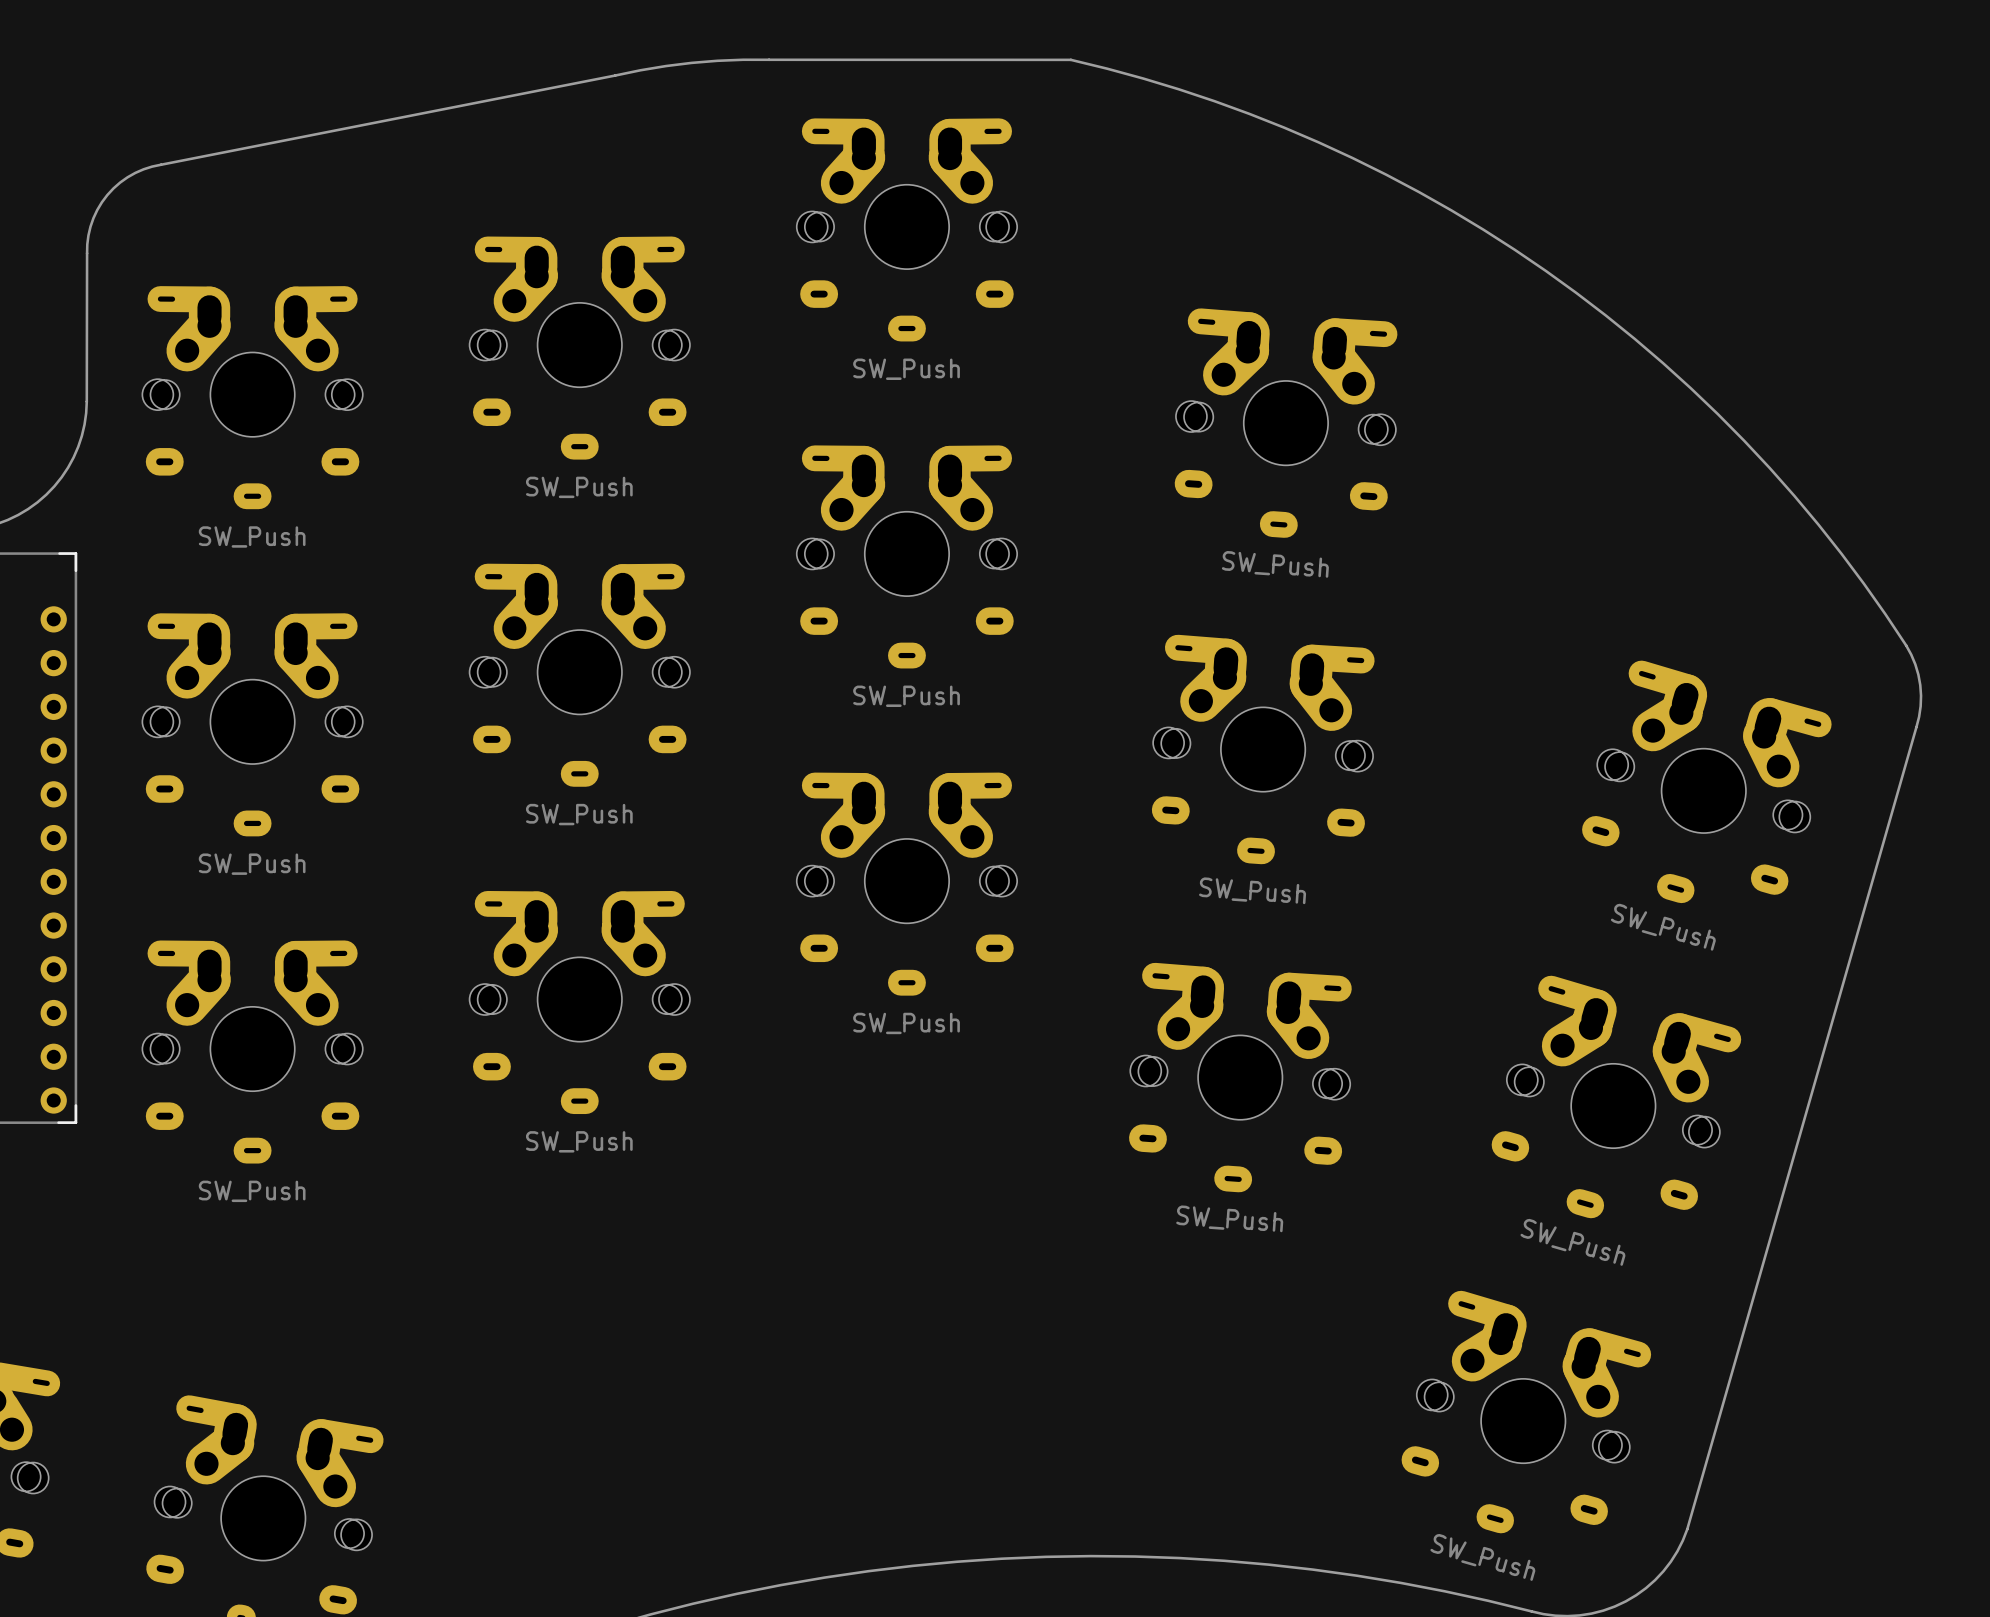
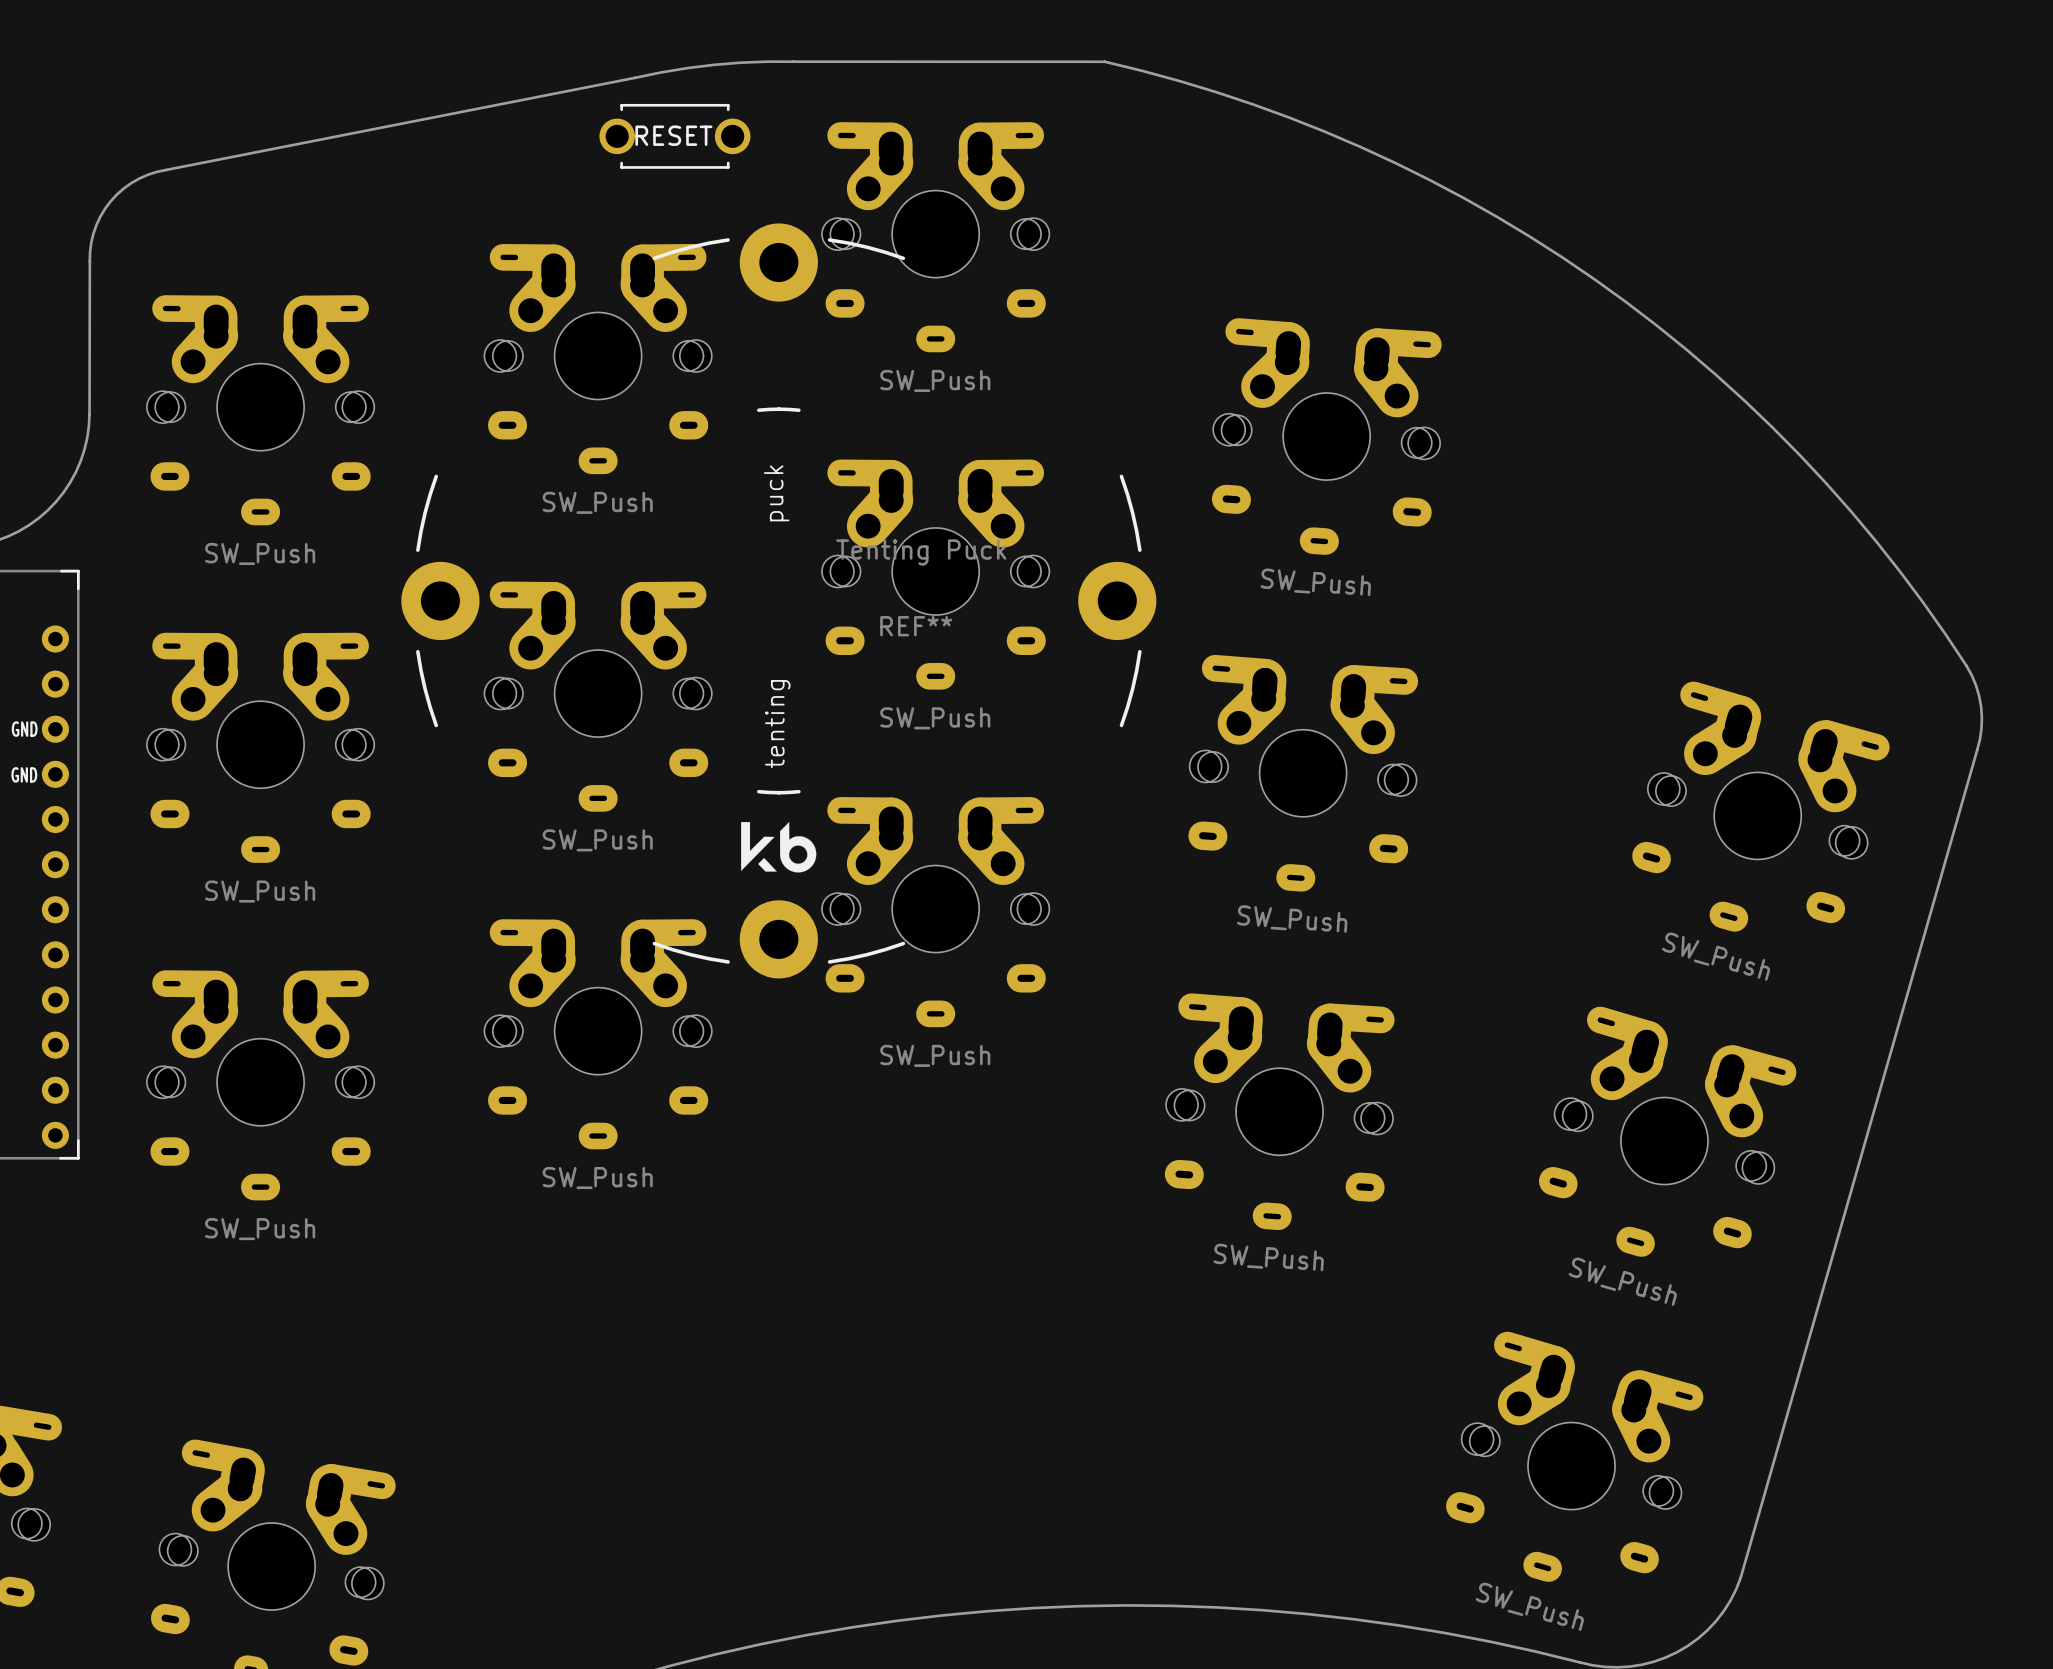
part: none -> (674, 136)
REF**: none -> Tenting Puck (778, 600)
part text: none -> GND (24, 729)
part text: none -> GND (24, 774)

